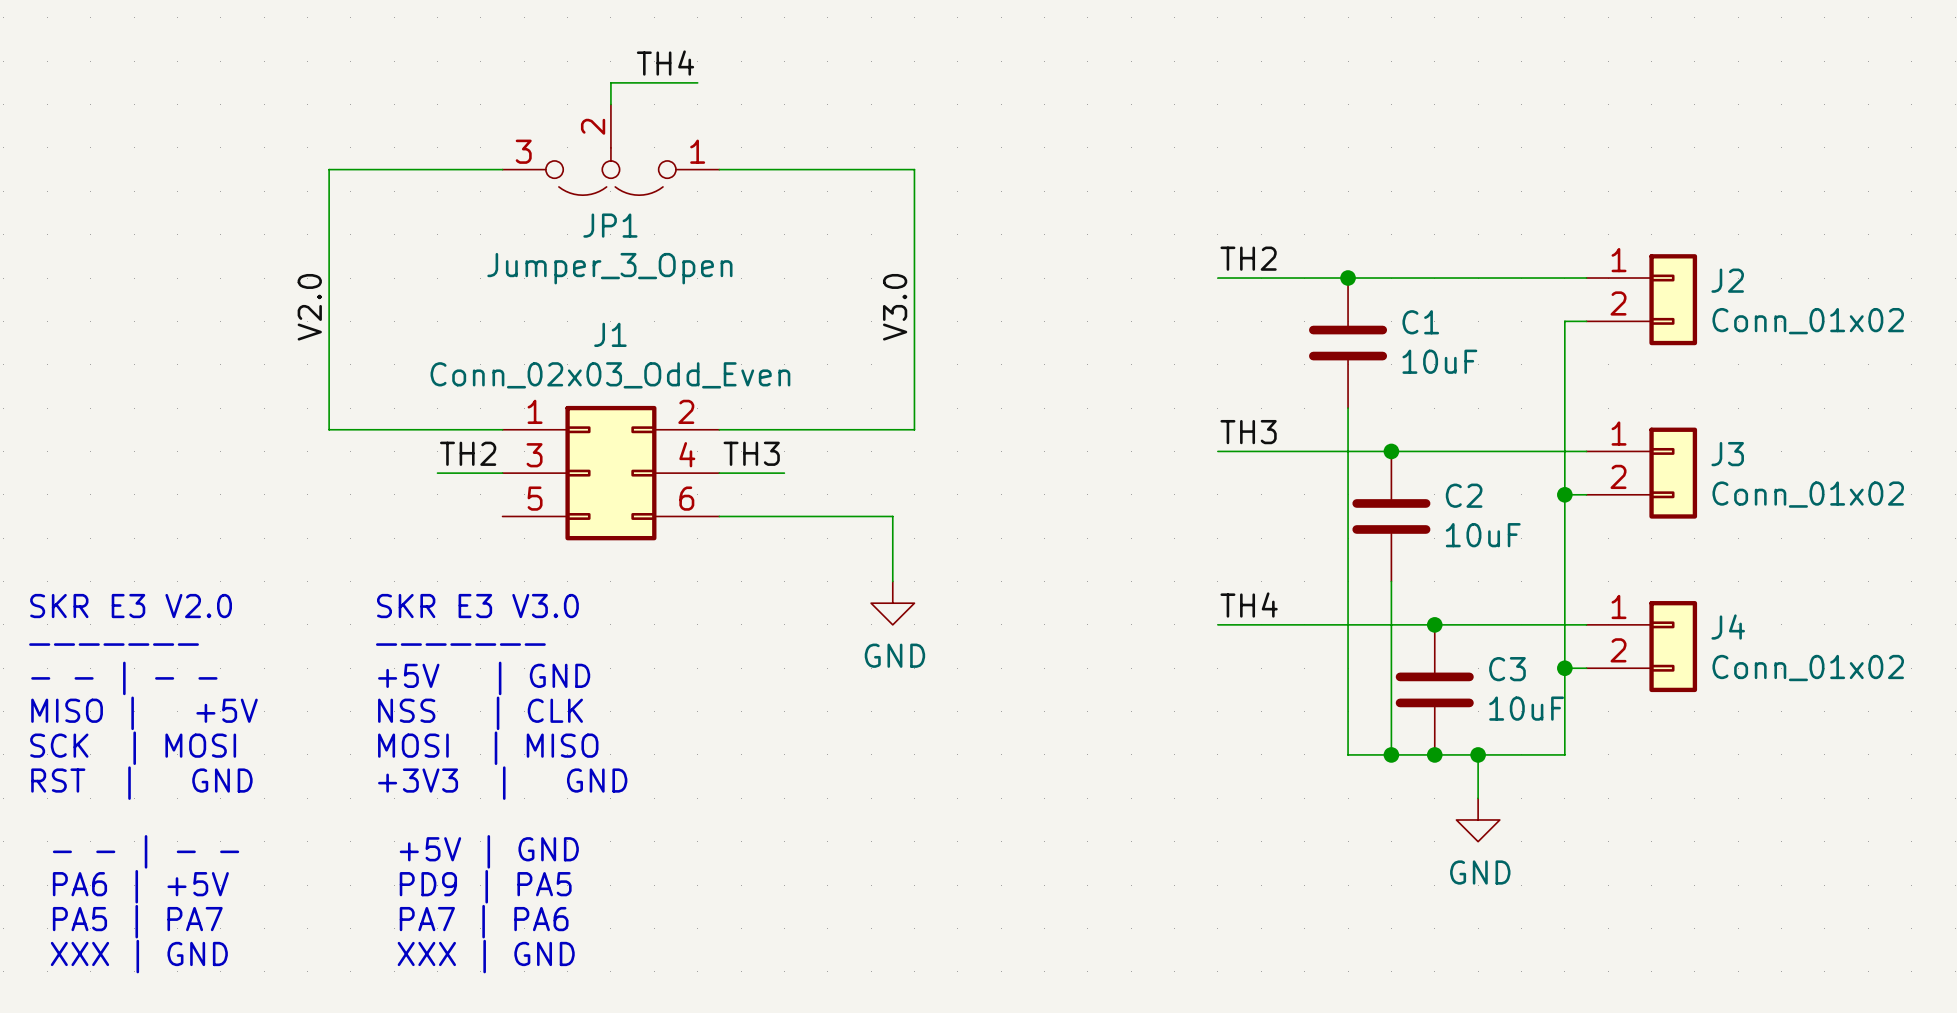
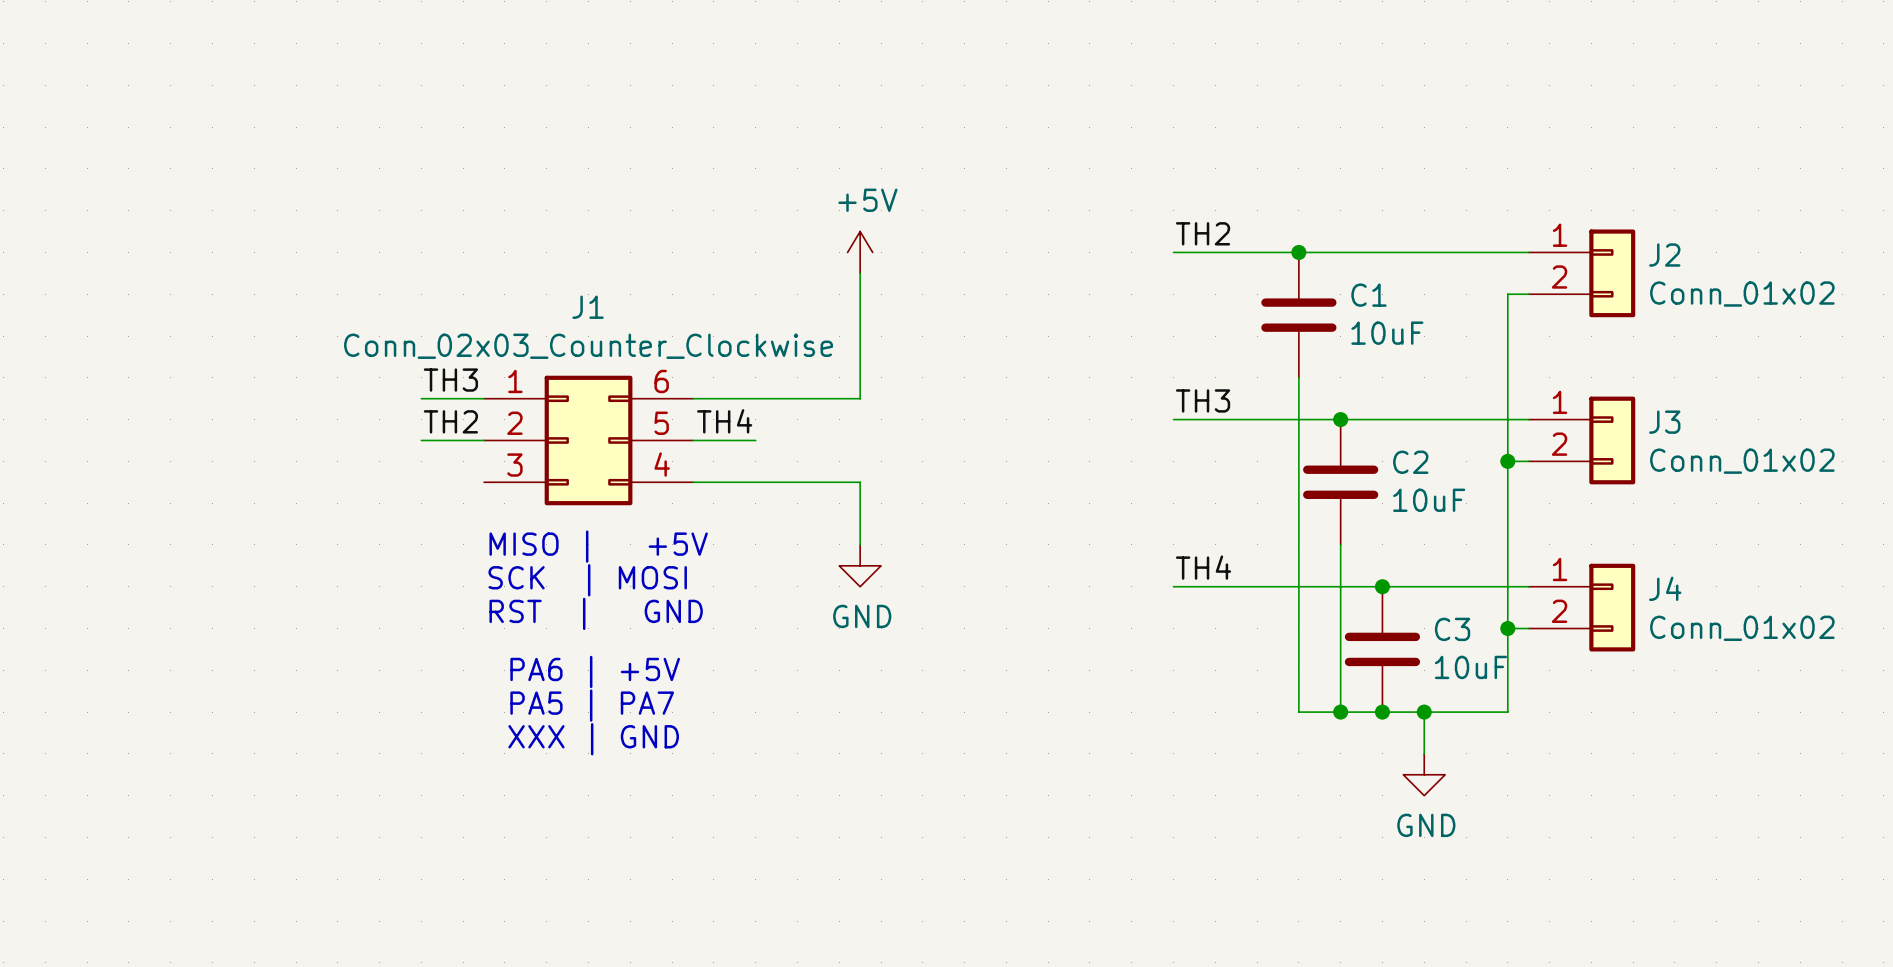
label: TH4 (665, 63) -> none
wire: (697, 82) (610, 82) (610, 104) -> none
JP1: Jumper_3_Open (610, 149) -> none
wire: (502, 169) (329, 169) (329, 429) (437, 429) -> none
wire: (719, 169) (914, 169) (914, 429) (892, 429) -> (860, 273) (860, 398)
power symbol: none -> +5V (860, 252)
label: V2.0 (309, 307) -> none
label: V3.0 (895, 307) -> none
J1 value: Conn_02x03_Odd_Even (610, 375) -> Conn_02x03_Counter_Clockwise (588, 346)
label: none -> TH3 (450, 380)
J1 pin number: 2 (686, 411) -> 6 (661, 381)
label: TH3 (751, 453) -> TH4 (724, 421)
J1 pin number: 4 (687, 454) -> 5 (661, 423)
J1 pin number: 3 (534, 455) -> 2 (514, 423)
J1 pin number: 5 (535, 498) -> 3 (514, 465)
J1 pin number: 6 (686, 498) -> 4 (662, 464)
text: none -> MISO | +5V (598, 546)
text: SKR E3 V2.0 (131, 606) -> none
text: SKR E3 V3.0 (477, 606) -> none
text: none -> SCK | MOSI (587, 580)
text: ——————— (114, 644) -> none
text: ——————— (460, 644) -> none
text: - - | - - (124, 678) -> none
text: +5V | GND (484, 678) -> RST | GND (596, 613)
text: MISO | +5V (144, 713) -> none
text: NSS | CLK (480, 713) -> none
text: none -> PA6 | +5V (595, 671)
text: SCK | MOSI (133, 748) -> none
text: MOSI | MISO (488, 748) -> none
text: none -> PA5 | PA7 (592, 705)
text: RST | GND (141, 783) -> none
text: +3V3 | GND (502, 783) -> none
text: - - | - - (146, 851) -> none
text: +5V | GND (489, 851) -> none
text: PA6 | +5V (140, 886) -> none
text: PD9 | PA5 (485, 886) -> none
text: PA5 | PA7 (137, 921) -> none
text: PA7 | PA6 (484, 921) -> none
text: XXX | GND (139, 956) -> none
text position: XXX | GND (486, 956) -> XXX | GND (593, 739)

